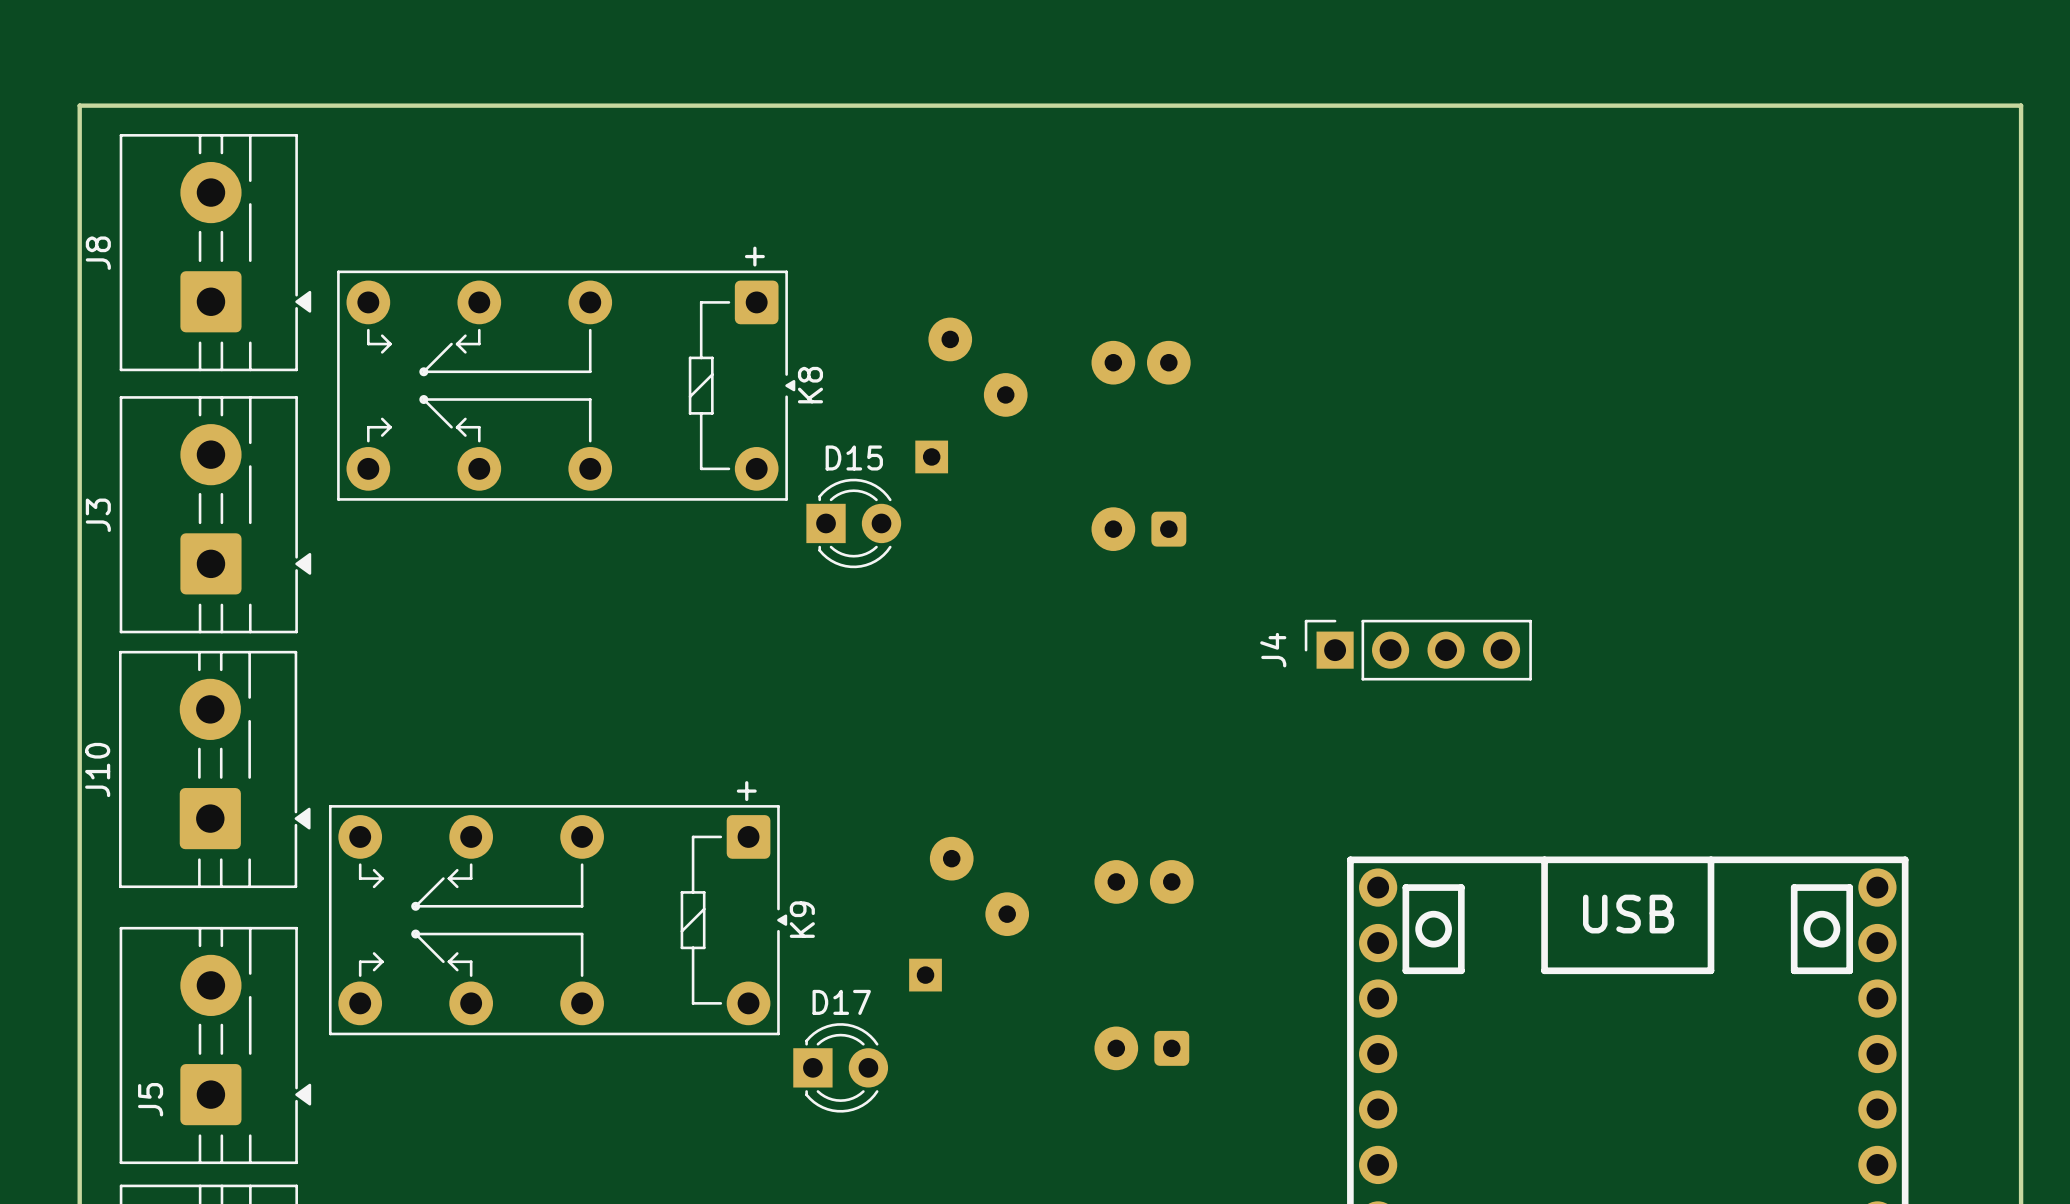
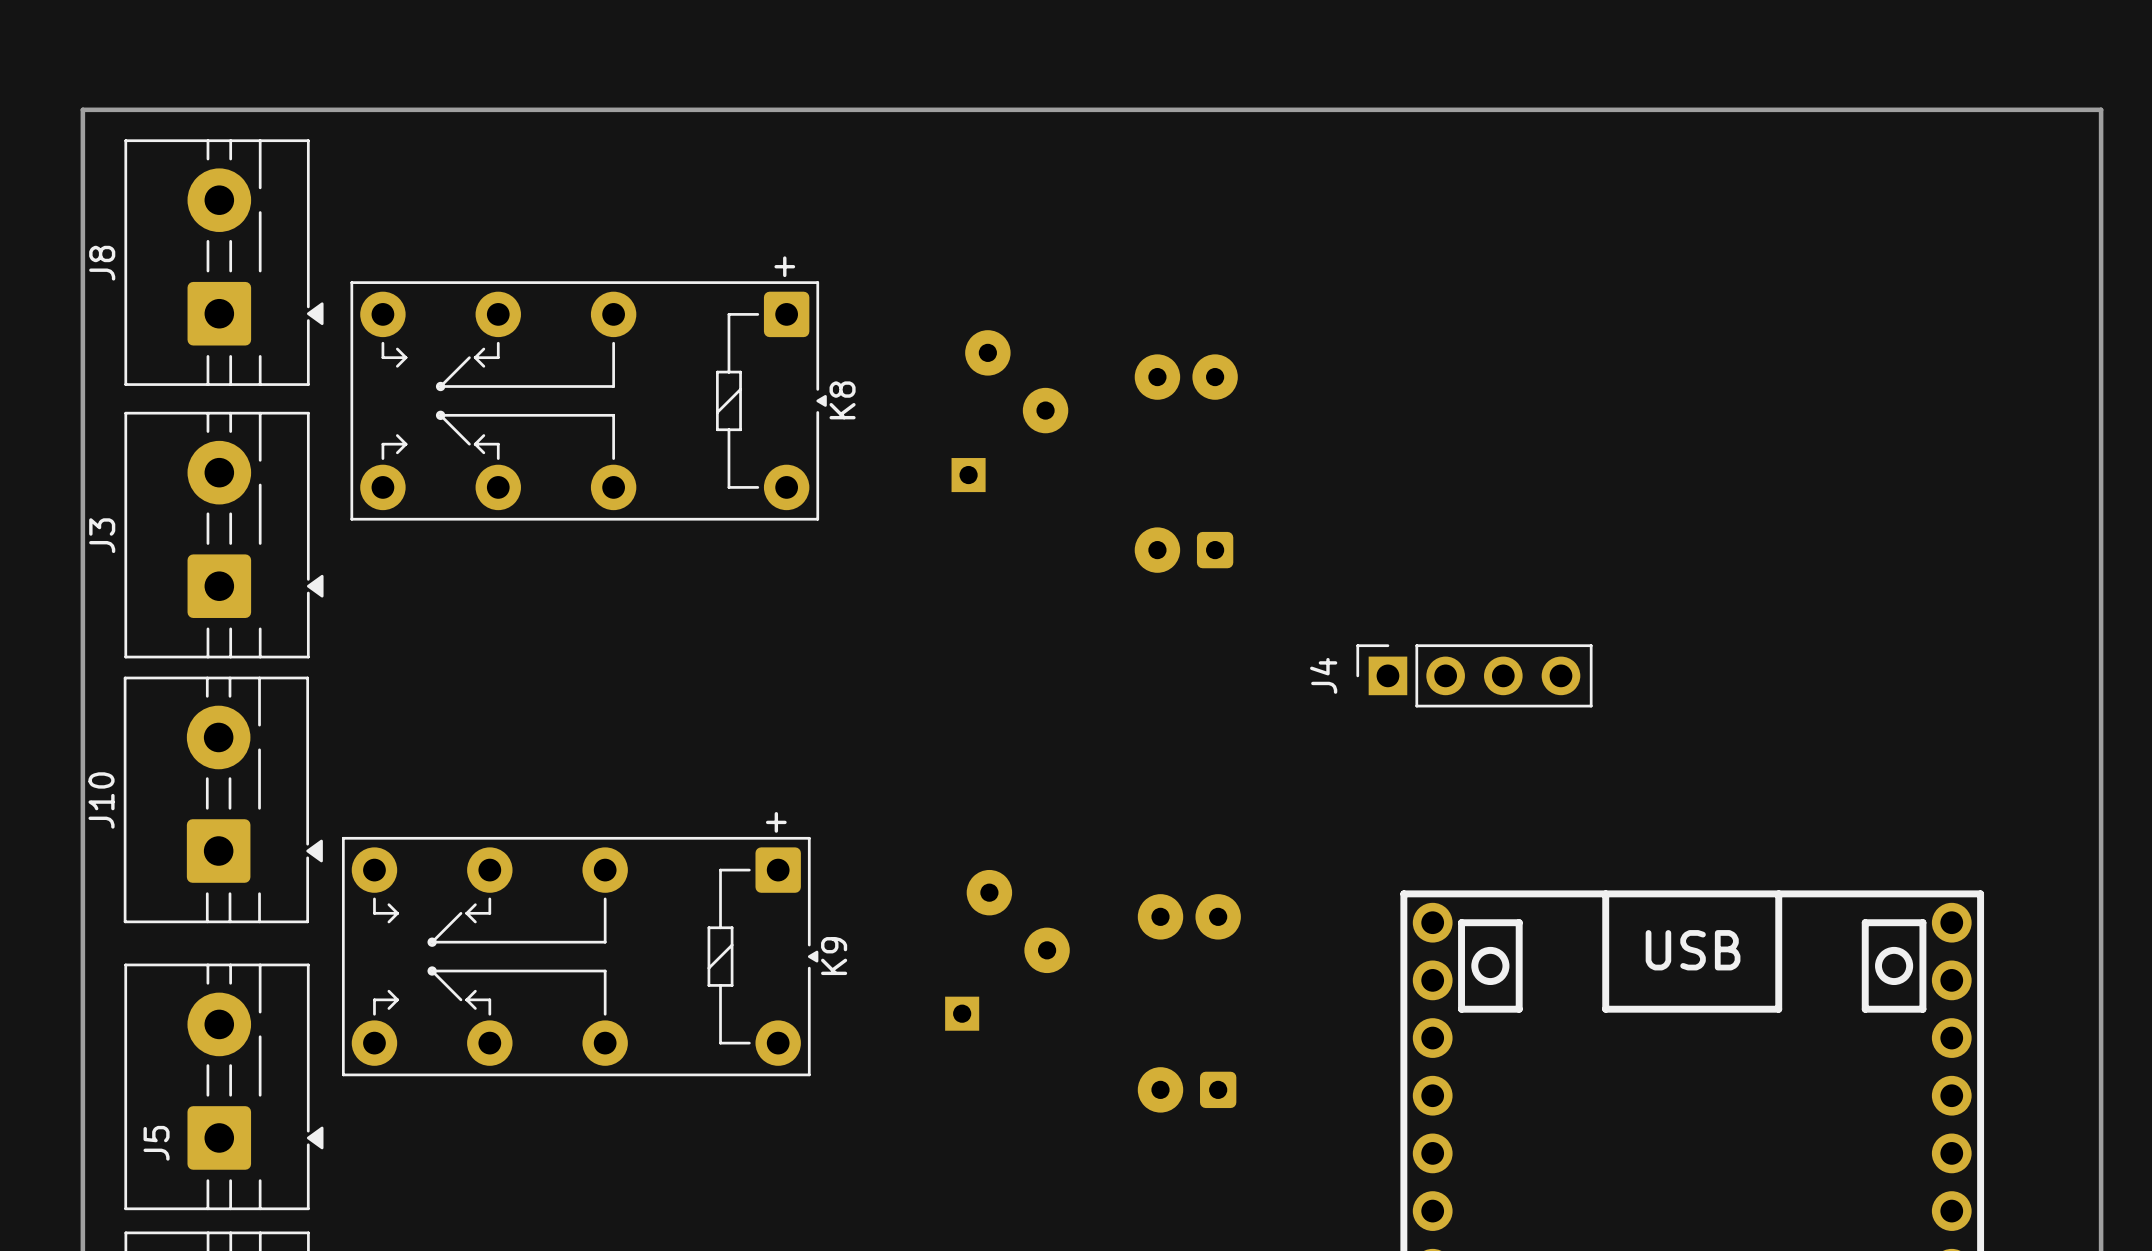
D15: (853, 523) -> none
D17: (840, 1067) -> none

